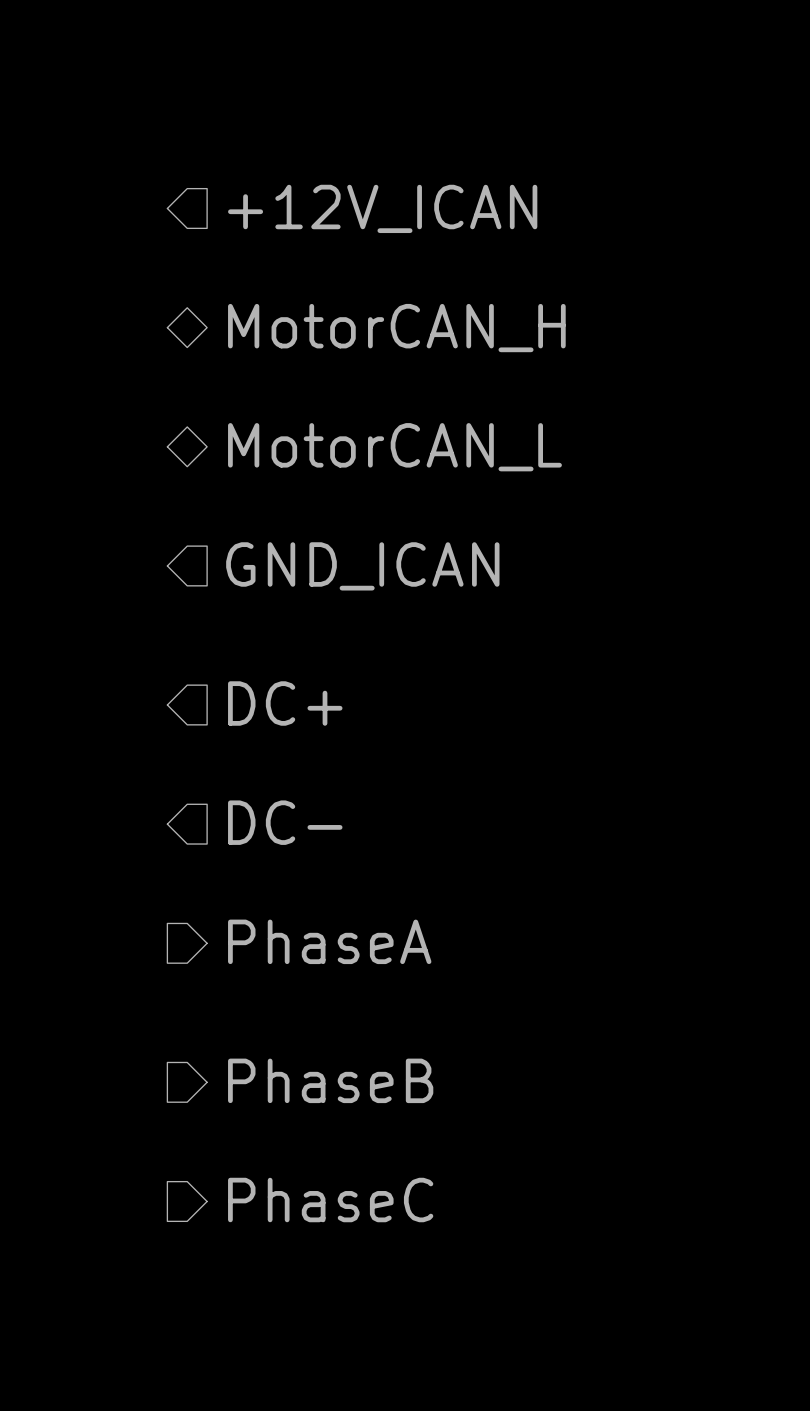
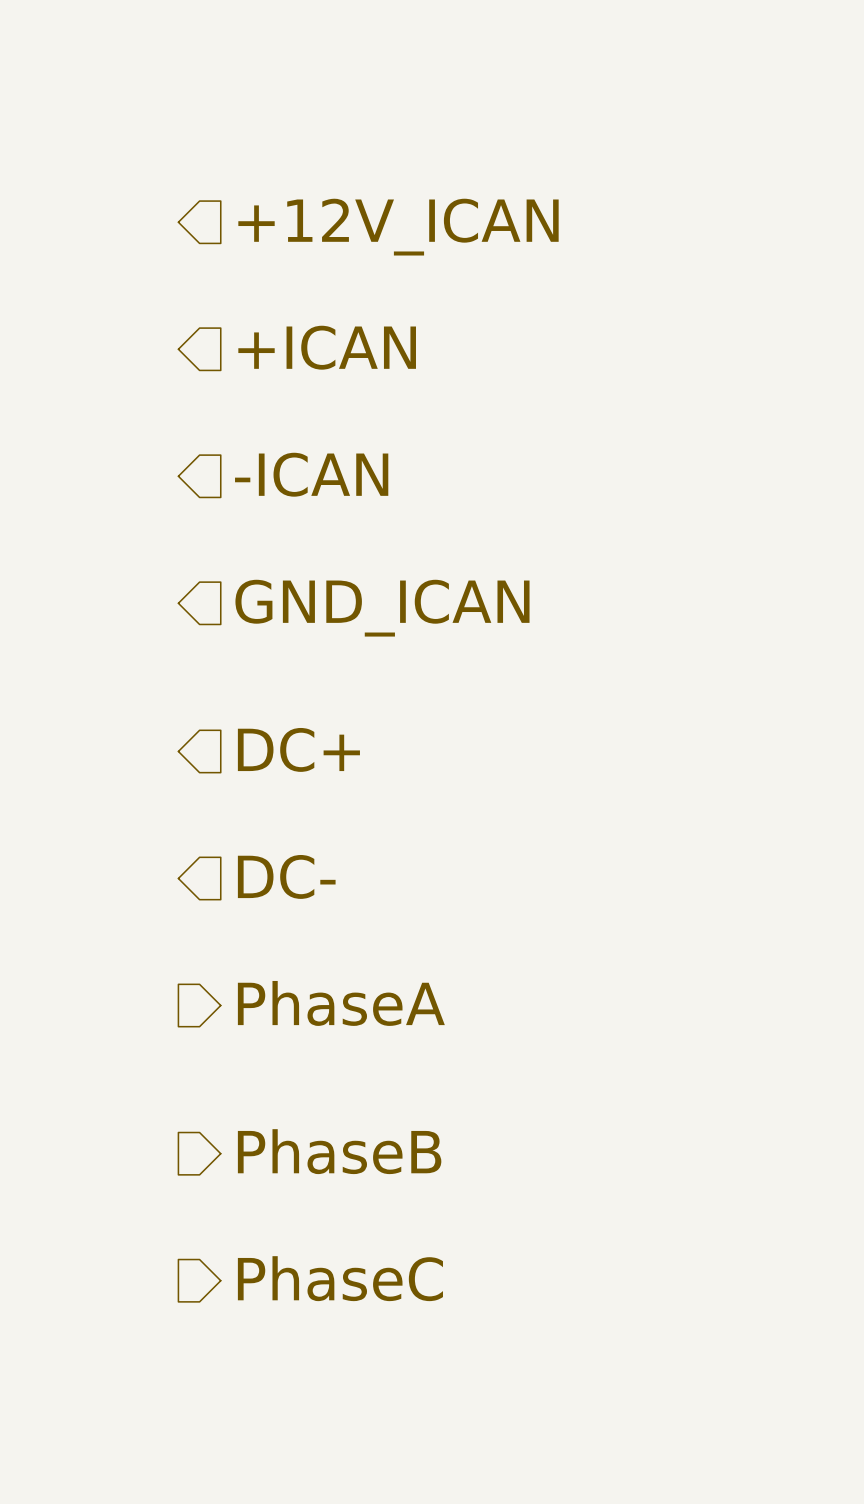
hierarchical label shape: bidirectional (396, 328) -> input (327, 347)
hierarchical label: MotorCAN_H (396, 328) -> +ICAN (327, 347)
hierarchical label shape: bidirectional (394, 447) -> input (311, 474)
hierarchical label: MotorCAN_L (394, 447) -> -ICAN (311, 474)

